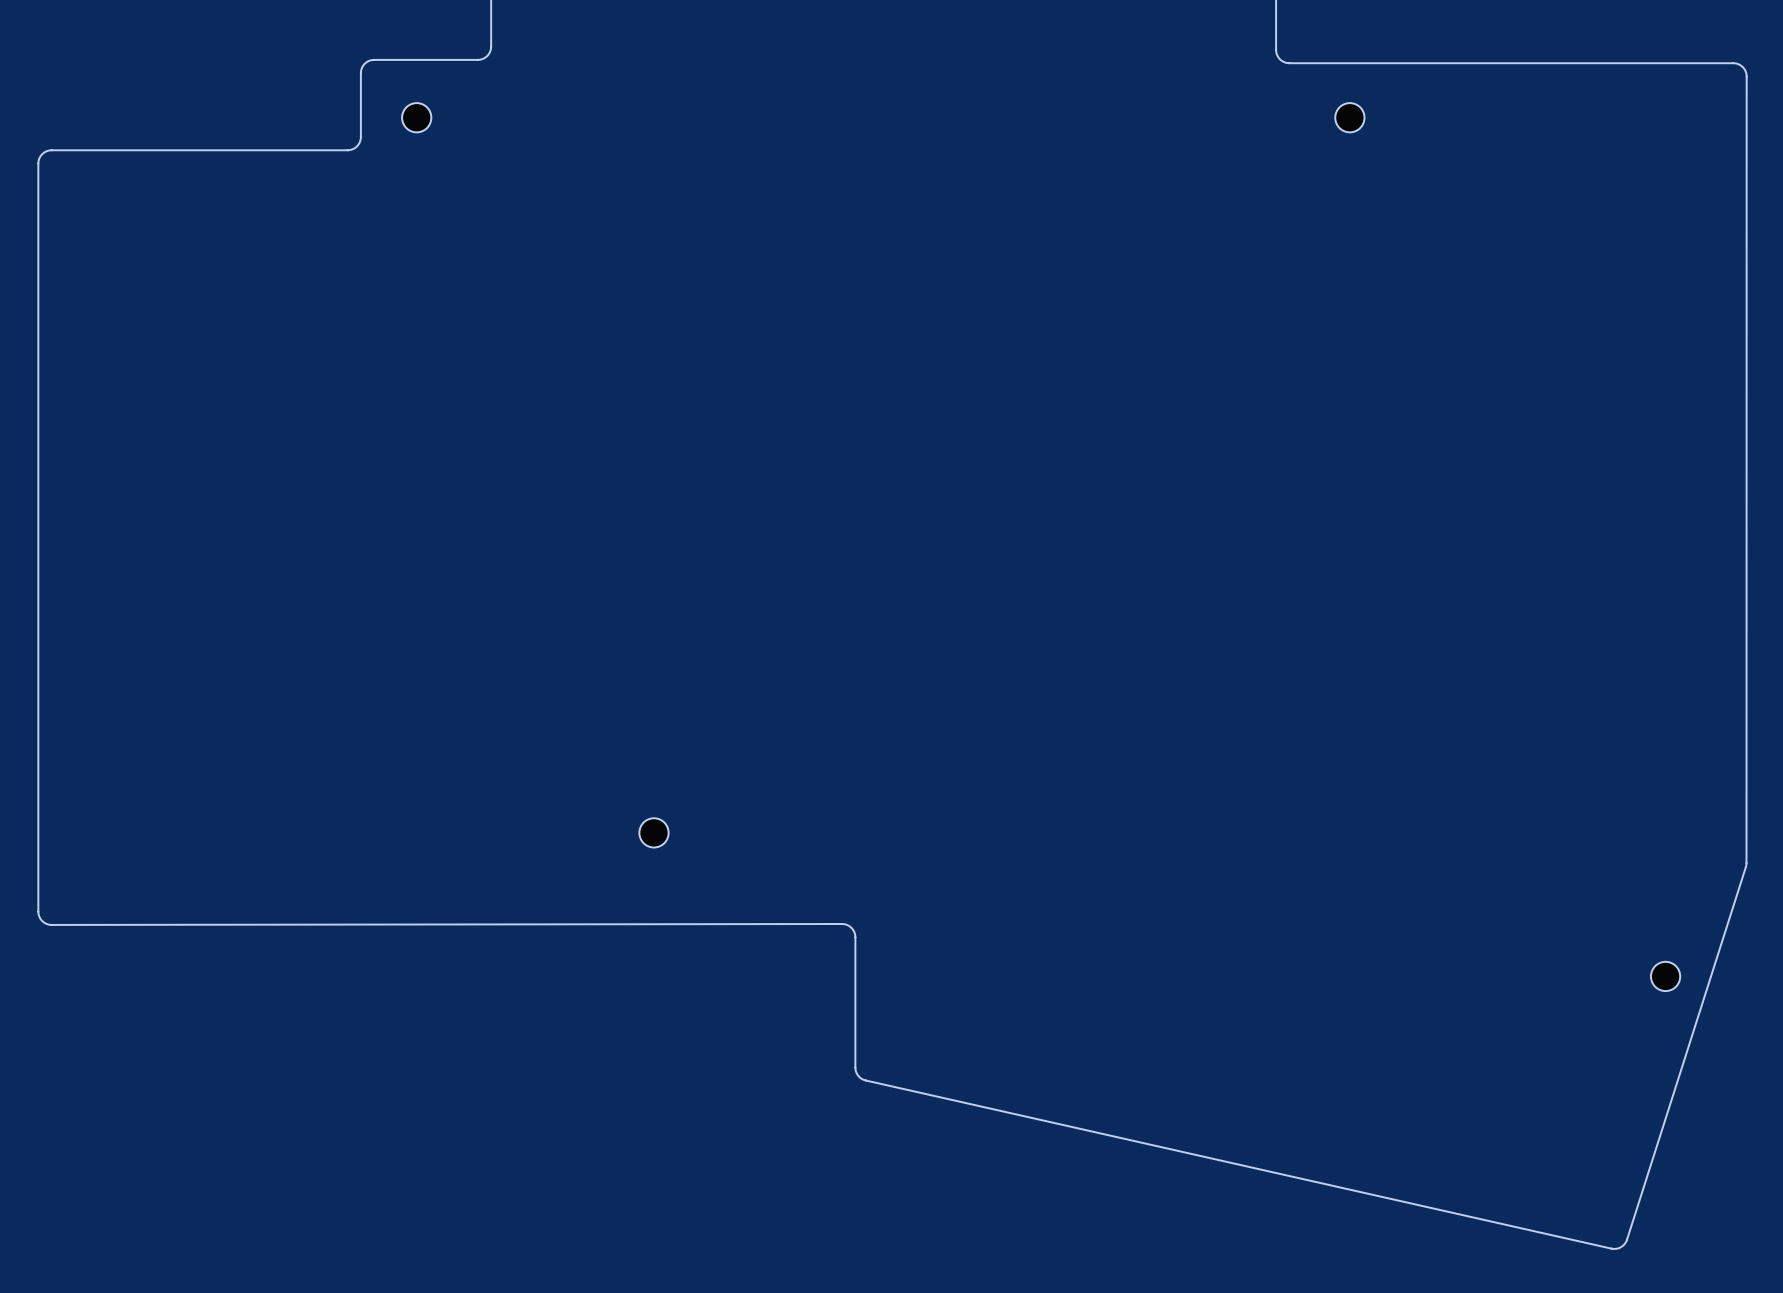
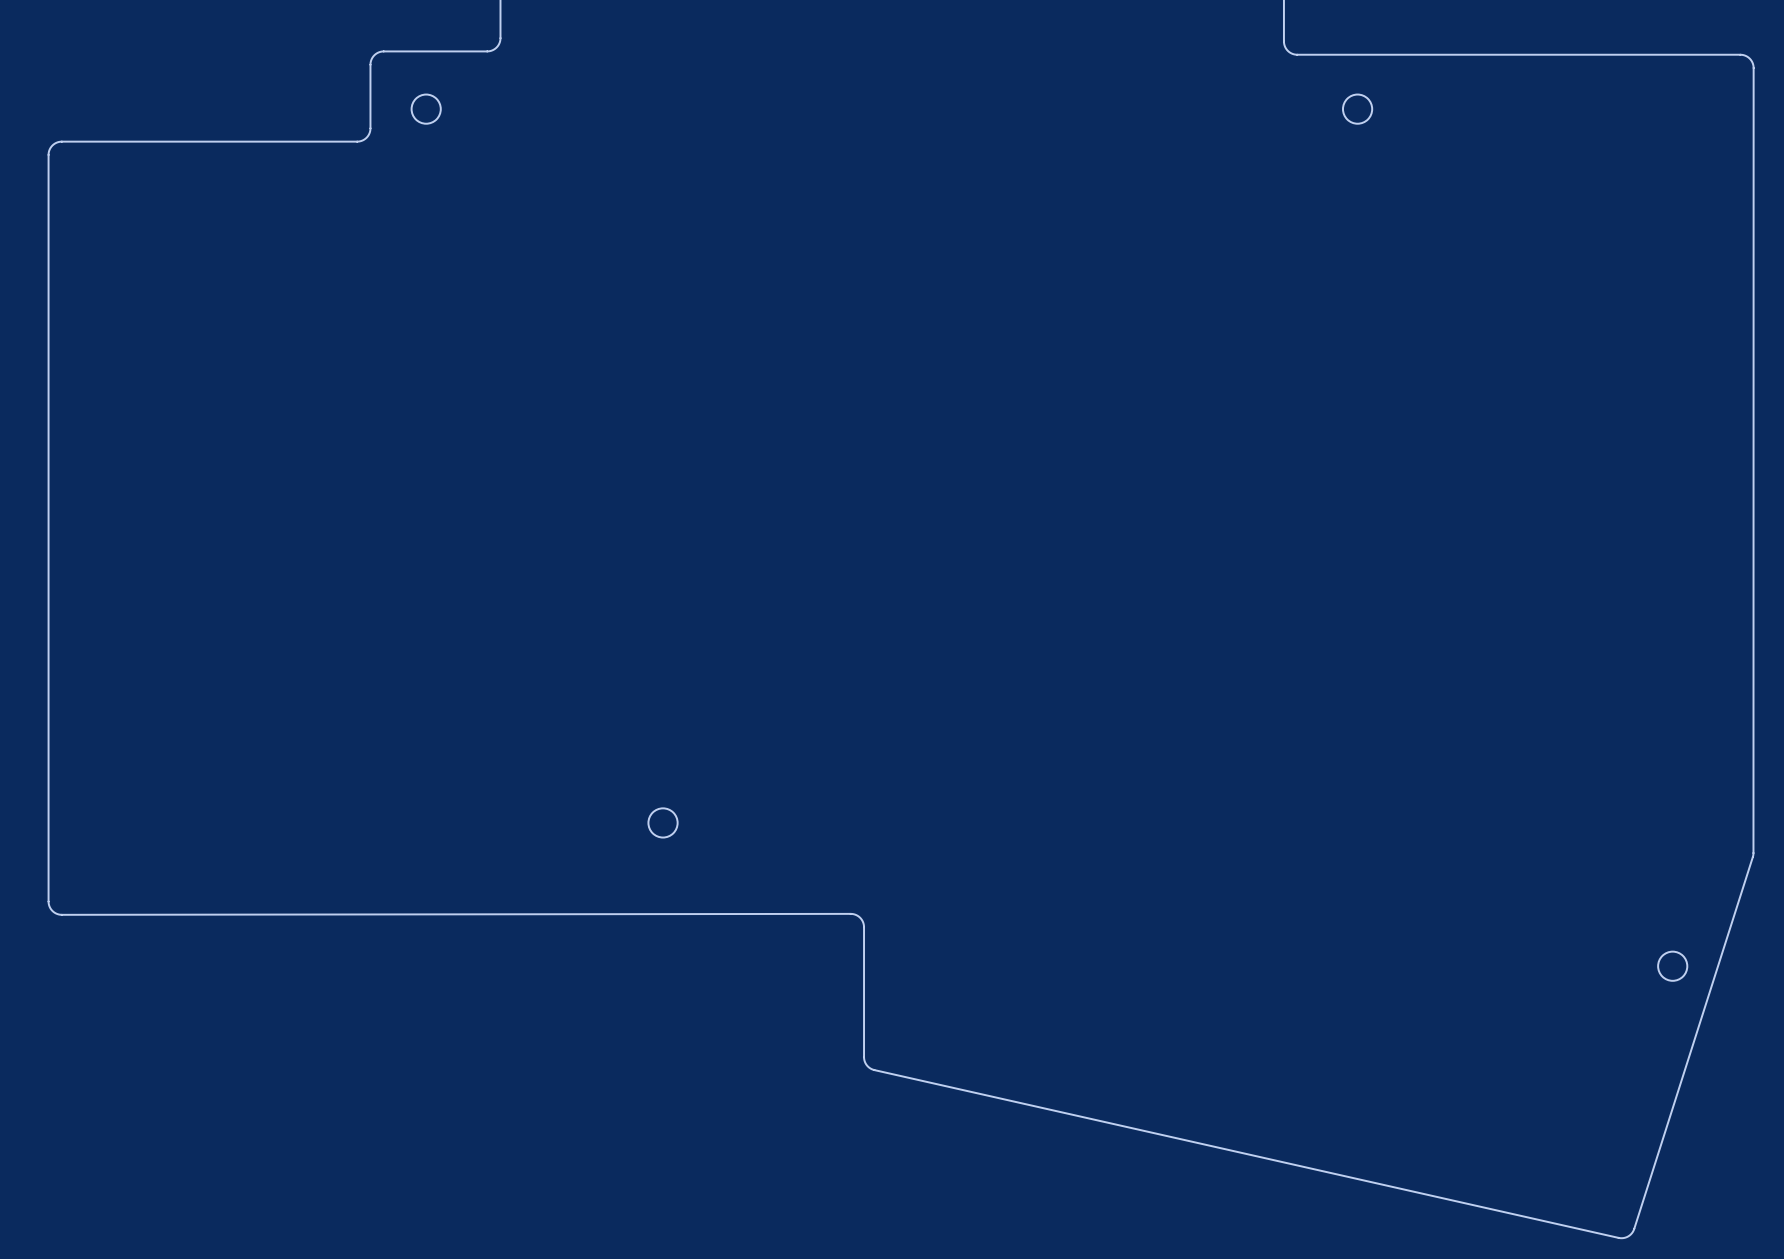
drawing: none -> [411, 94, 441, 124]
drawing: none -> [1342, 94, 1373, 124]
part: (416, 117) -> none
part: (1349, 117) -> none
drawing: none -> [648, 808, 678, 838]
part: (653, 832) -> none
drawing: none -> [1658, 951, 1688, 981]
part: (1665, 976) -> none

